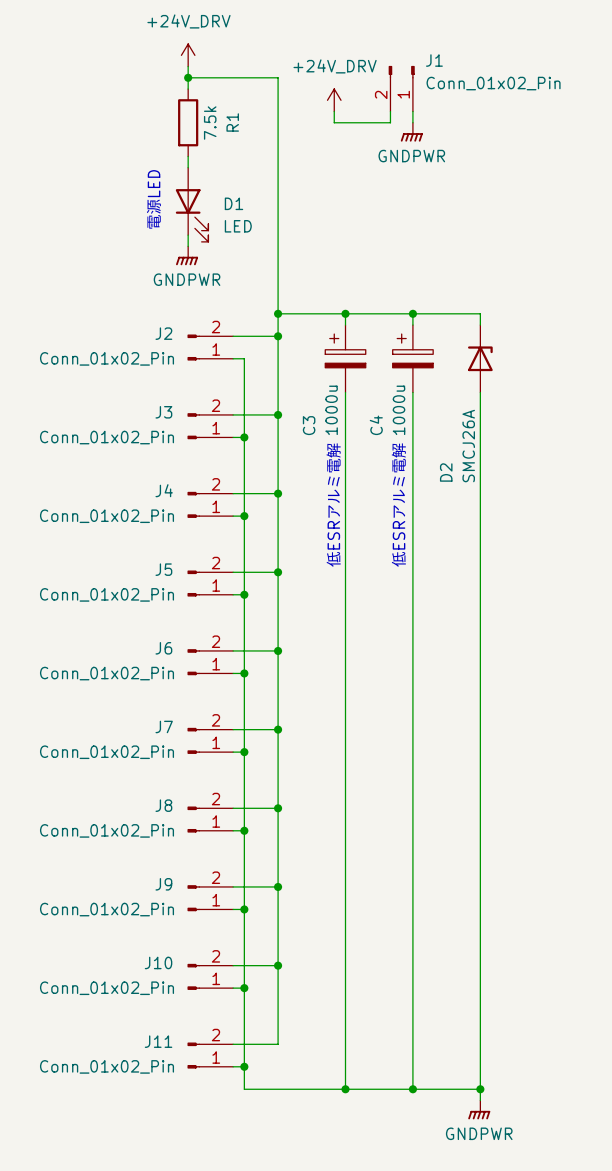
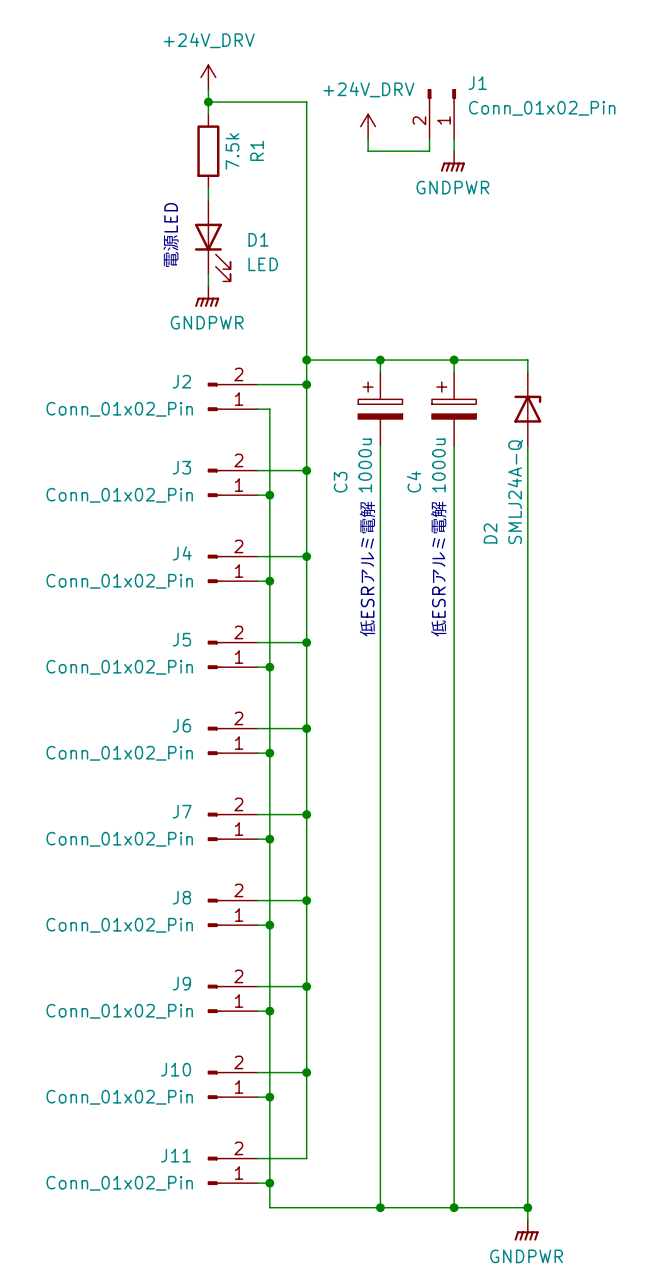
D2 value: SMCJ26A (468, 446) -> SMLJ24A-Q (515, 491)

